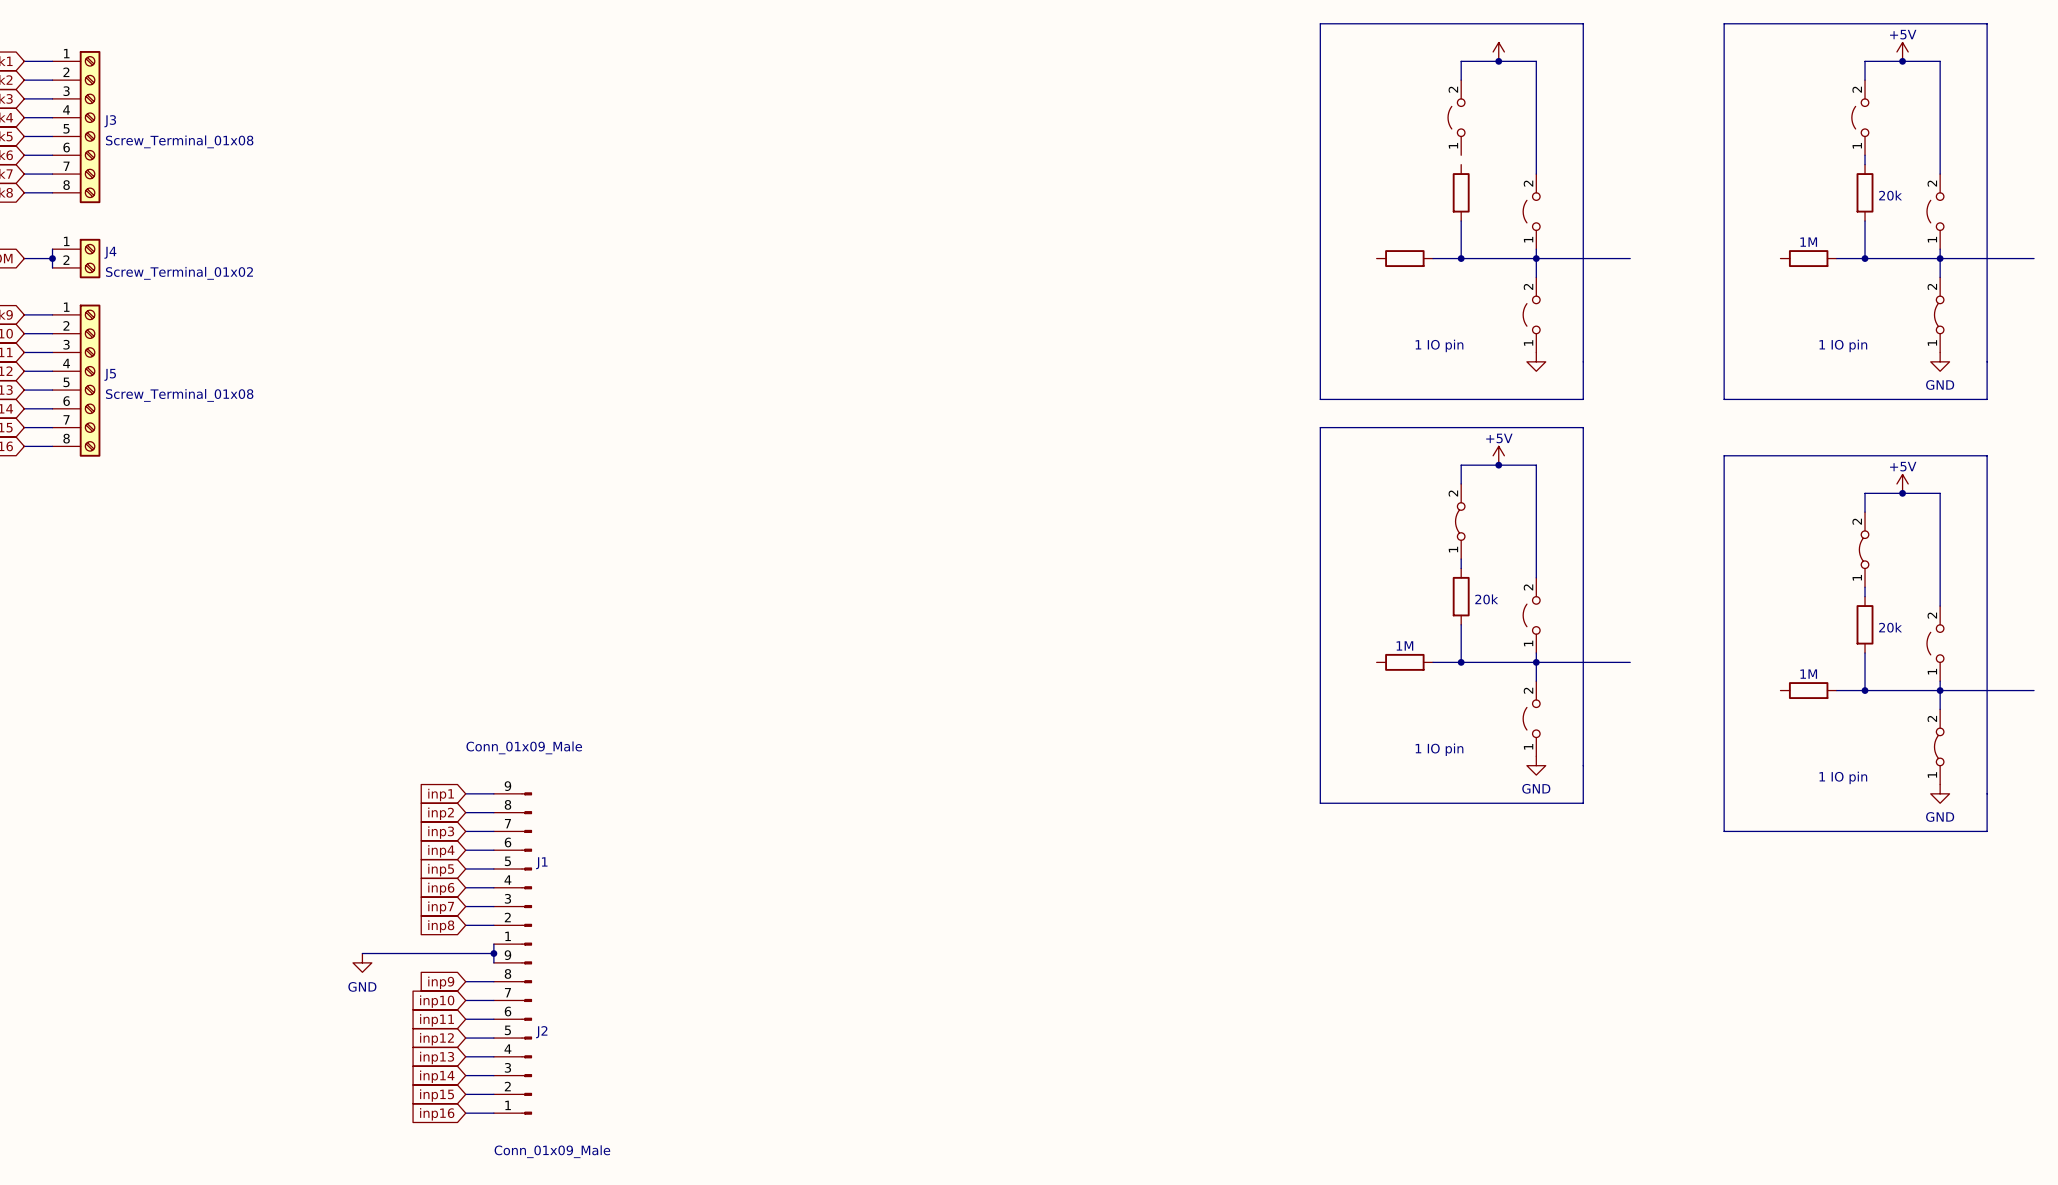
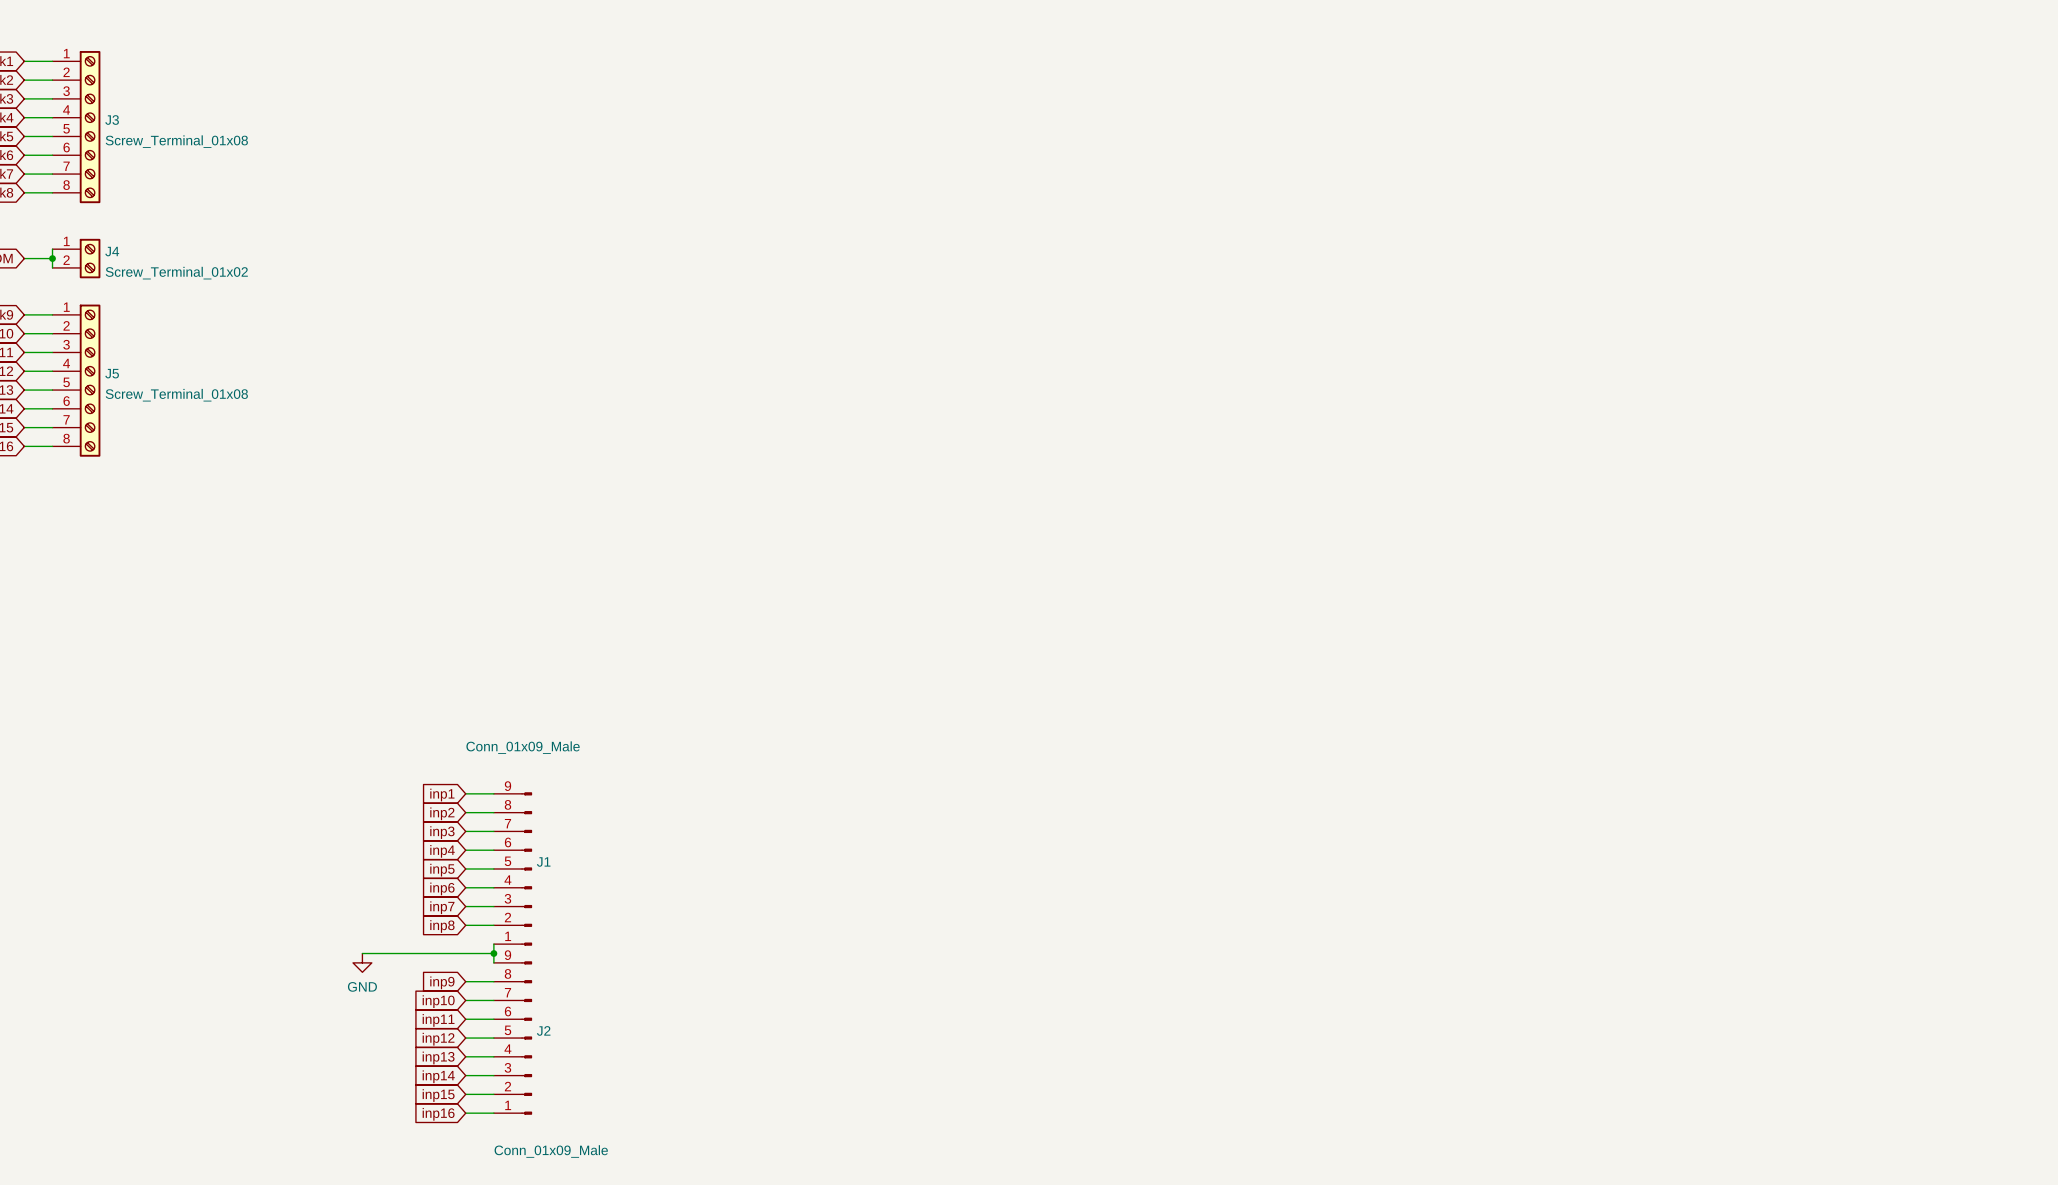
line: (1320, 23) (1320, 399) (1583, 399) (1583, 23) (1320, 23) -> none
line: (1724, 23) (1987, 23) (1987, 399) (1724, 399) (1724, 23) -> none
power symbol: (1498, 51) -> none
power symbol: +5V (1902, 51) -> none
junction: (1498, 61) -> none
junction: (1902, 61) -> none
wire: (1461, 80) (1461, 61) (1536, 61) (1536, 174) -> none
wire: (1865, 80) (1865, 61) (1940, 61) (1940, 174) -> none
part: (1456, 117) -> none
part: (1860, 117) -> none
wire: (1865, 155) (1865, 164) -> none
part: (1461, 192) -> none
part: 20k (1865, 192) -> none
part: (1531, 211) -> none
part: (1935, 211) -> none
wire: (1461, 221) (1461, 258) -> none
wire: (1865, 221) (1865, 258) -> none
wire: (1536, 249) (1536, 277) -> none
wire: (1940, 249) (1940, 277) -> none
part: (1404, 258) -> none
wire: (1433, 258) (1630, 258) -> none
junction: (1461, 258) -> none
junction: (1536, 258) -> none
part: 1M (1808, 258) -> none
wire: (1836, 258) (2034, 258) -> none
junction: (1865, 258) -> none
junction: (1940, 258) -> none
part: (1531, 314) -> none
part: (1939, 314) -> none
text: 1 IO pin (1439, 345) -> none
text: 1 IO pin (1843, 345) -> none
power symbol: (1536, 361) -> none
power symbol: GND (1940, 361) -> none
line: (1320, 427) (1320, 803) (1583, 803) (1583, 427) (1320, 427) -> none
power symbol: +5V (1498, 455) -> none
line: (1724, 455) (1987, 455) (1987, 831) (1724, 831) (1724, 455) -> none
junction: (1498, 465) -> none
wire: (1461, 483) (1461, 465) (1536, 465) (1536, 577) -> none
power symbol: +5V (1902, 483) -> none
junction: (1902, 493) -> none
wire: (1865, 512) (1865, 493) (1940, 493) (1940, 606) -> none
part: (1460, 521) -> none
part: (1864, 549) -> none
wire: (1461, 559) (1461, 568) -> none
wire: (1865, 587) (1865, 596) -> none
part: 20k (1461, 596) -> none
part: (1531, 615) -> none
wire: (1461, 624) (1461, 662) -> none
part: 20k (1865, 624) -> none
part: (1935, 643) -> none
wire: (1536, 652) (1536, 681) -> none
wire: (1865, 652) (1865, 690) -> none
part: 1M (1404, 662) -> none
wire: (1433, 662) (1630, 662) -> none
junction: (1461, 662) -> none
junction: (1536, 662) -> none
wire: (1940, 681) (1940, 709) -> none
part: 1M (1808, 690) -> none
wire: (1836, 690) (2034, 690) -> none
junction: (1865, 690) -> none
junction: (1940, 690) -> none
part: (1531, 718) -> none
part: (1939, 746) -> none
text: 1 IO pin (1439, 749) -> none
power symbol: GND (1536, 765) -> none
text: 1 IO pin (1843, 777) -> none
power symbol: GND (1940, 793) -> none

